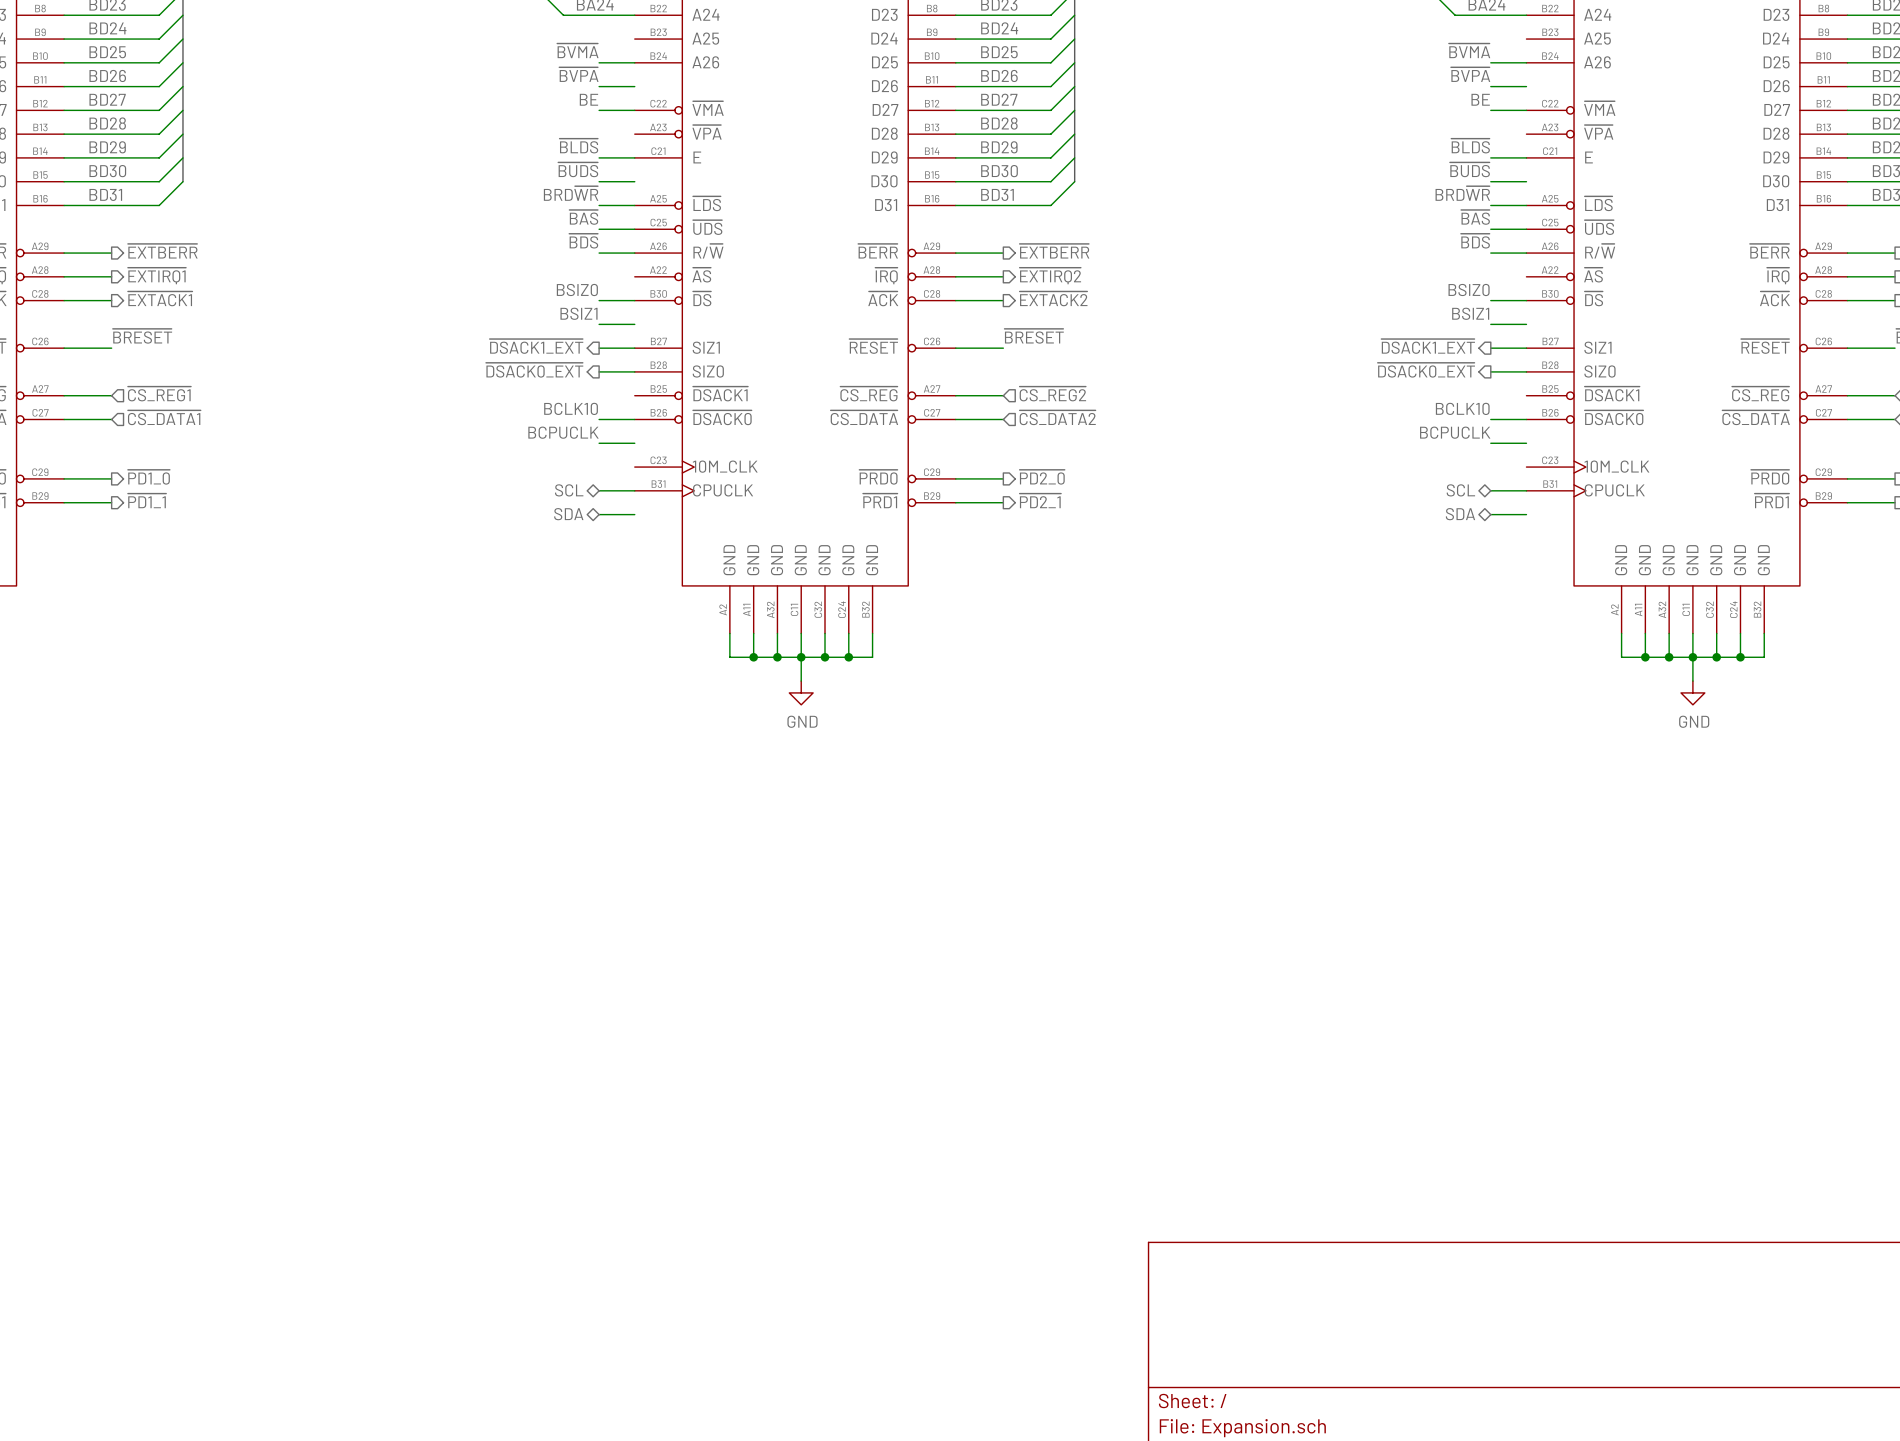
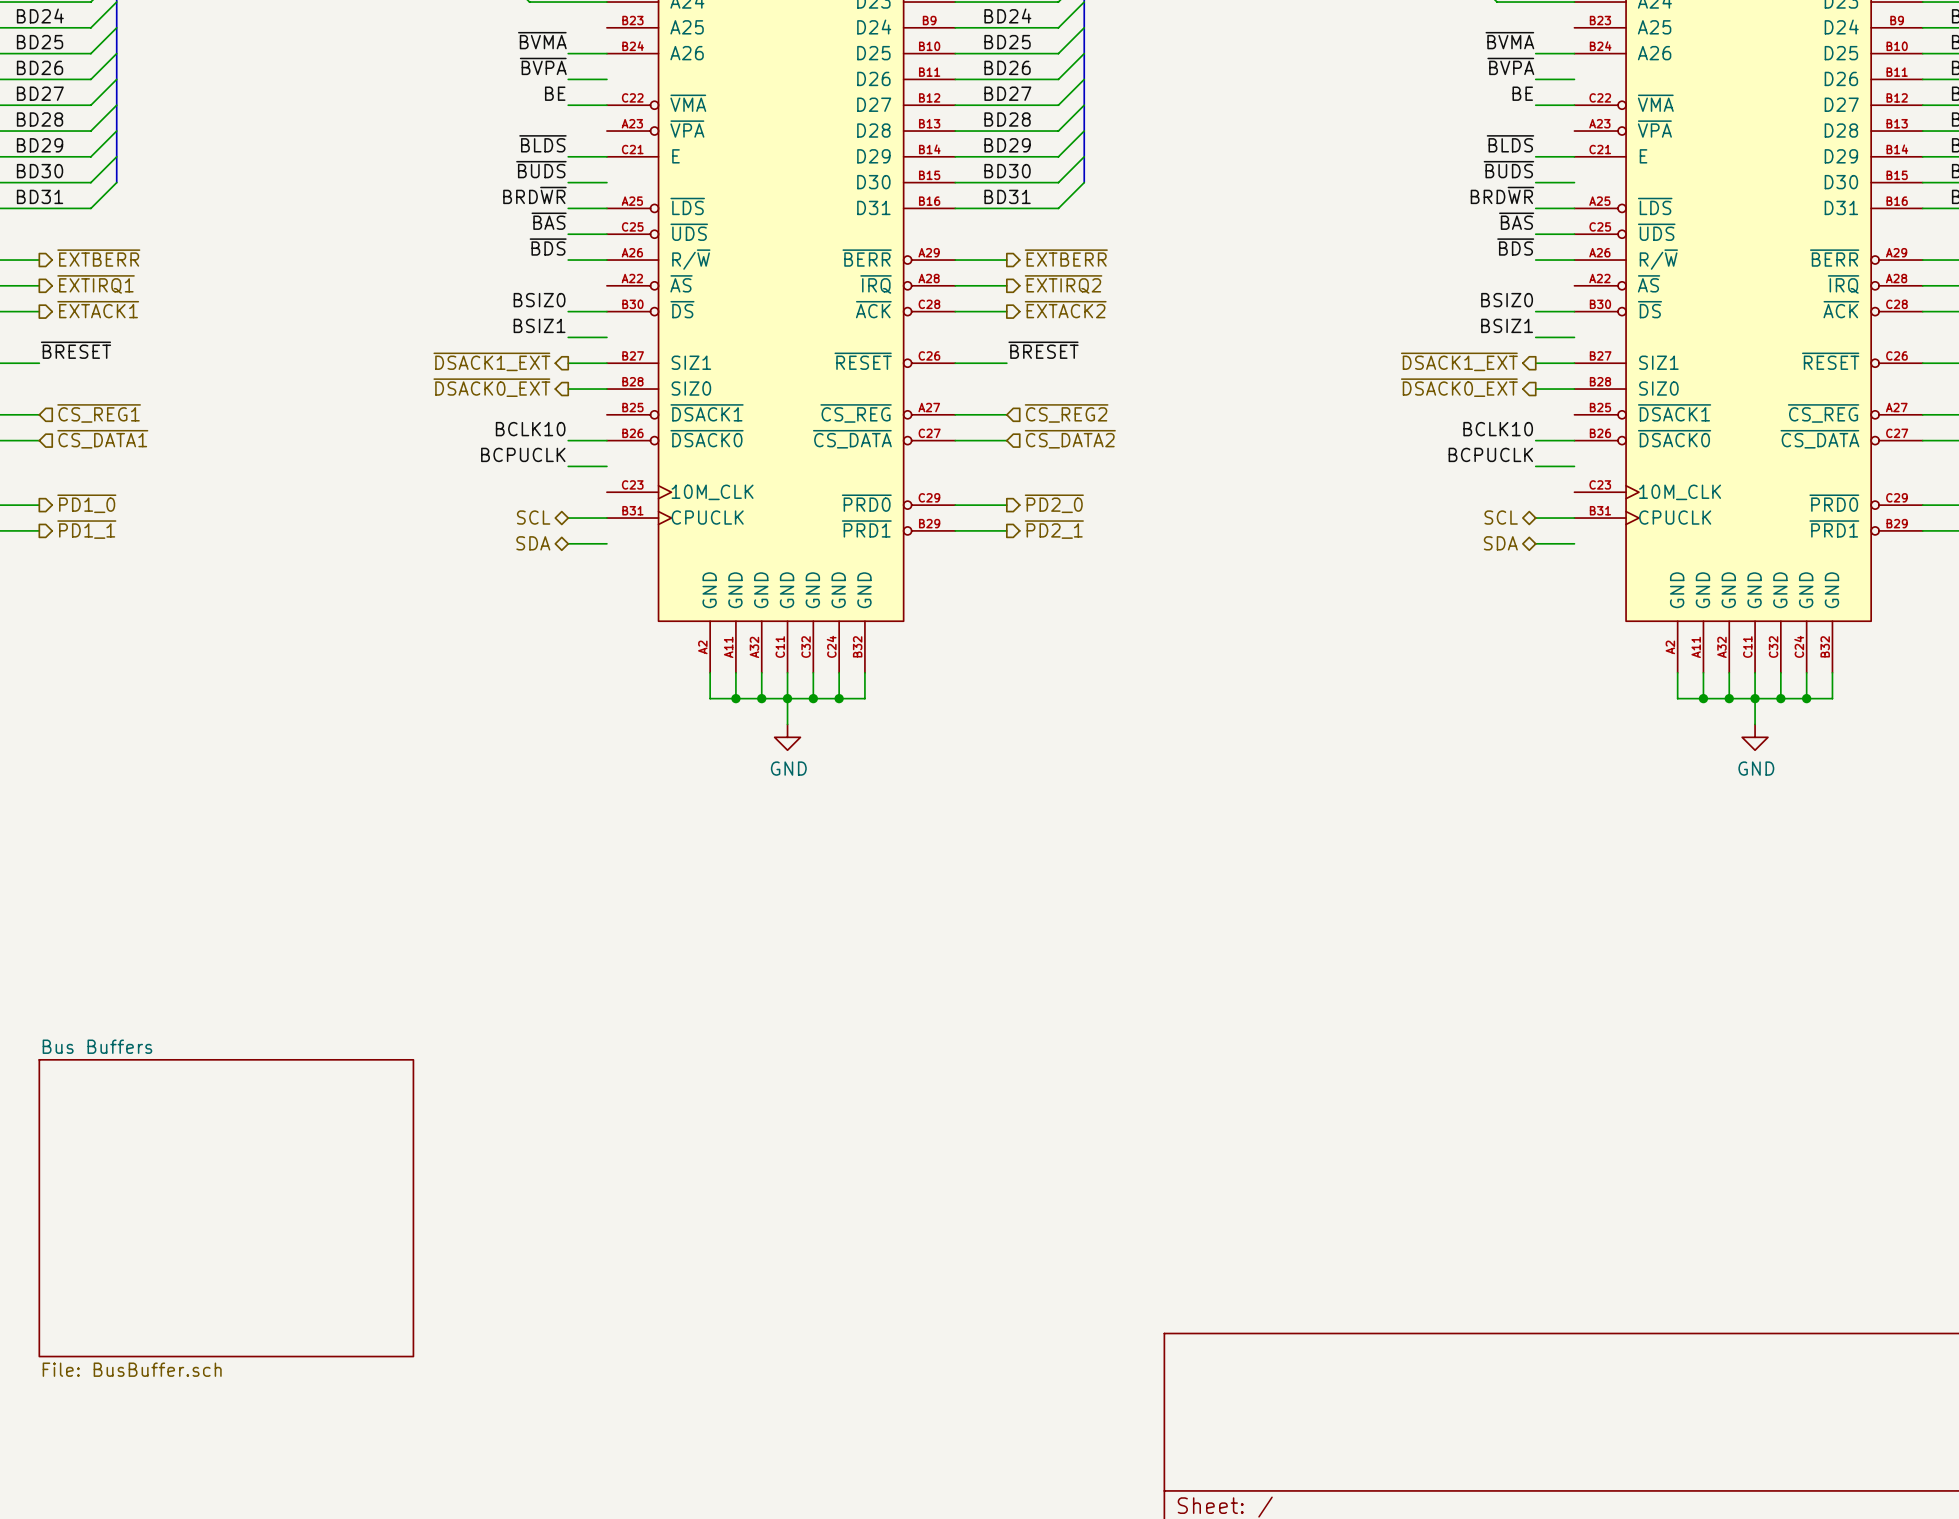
sheet Bus Buffers: none -> File: BusBuffer.sch (226, 1208)

